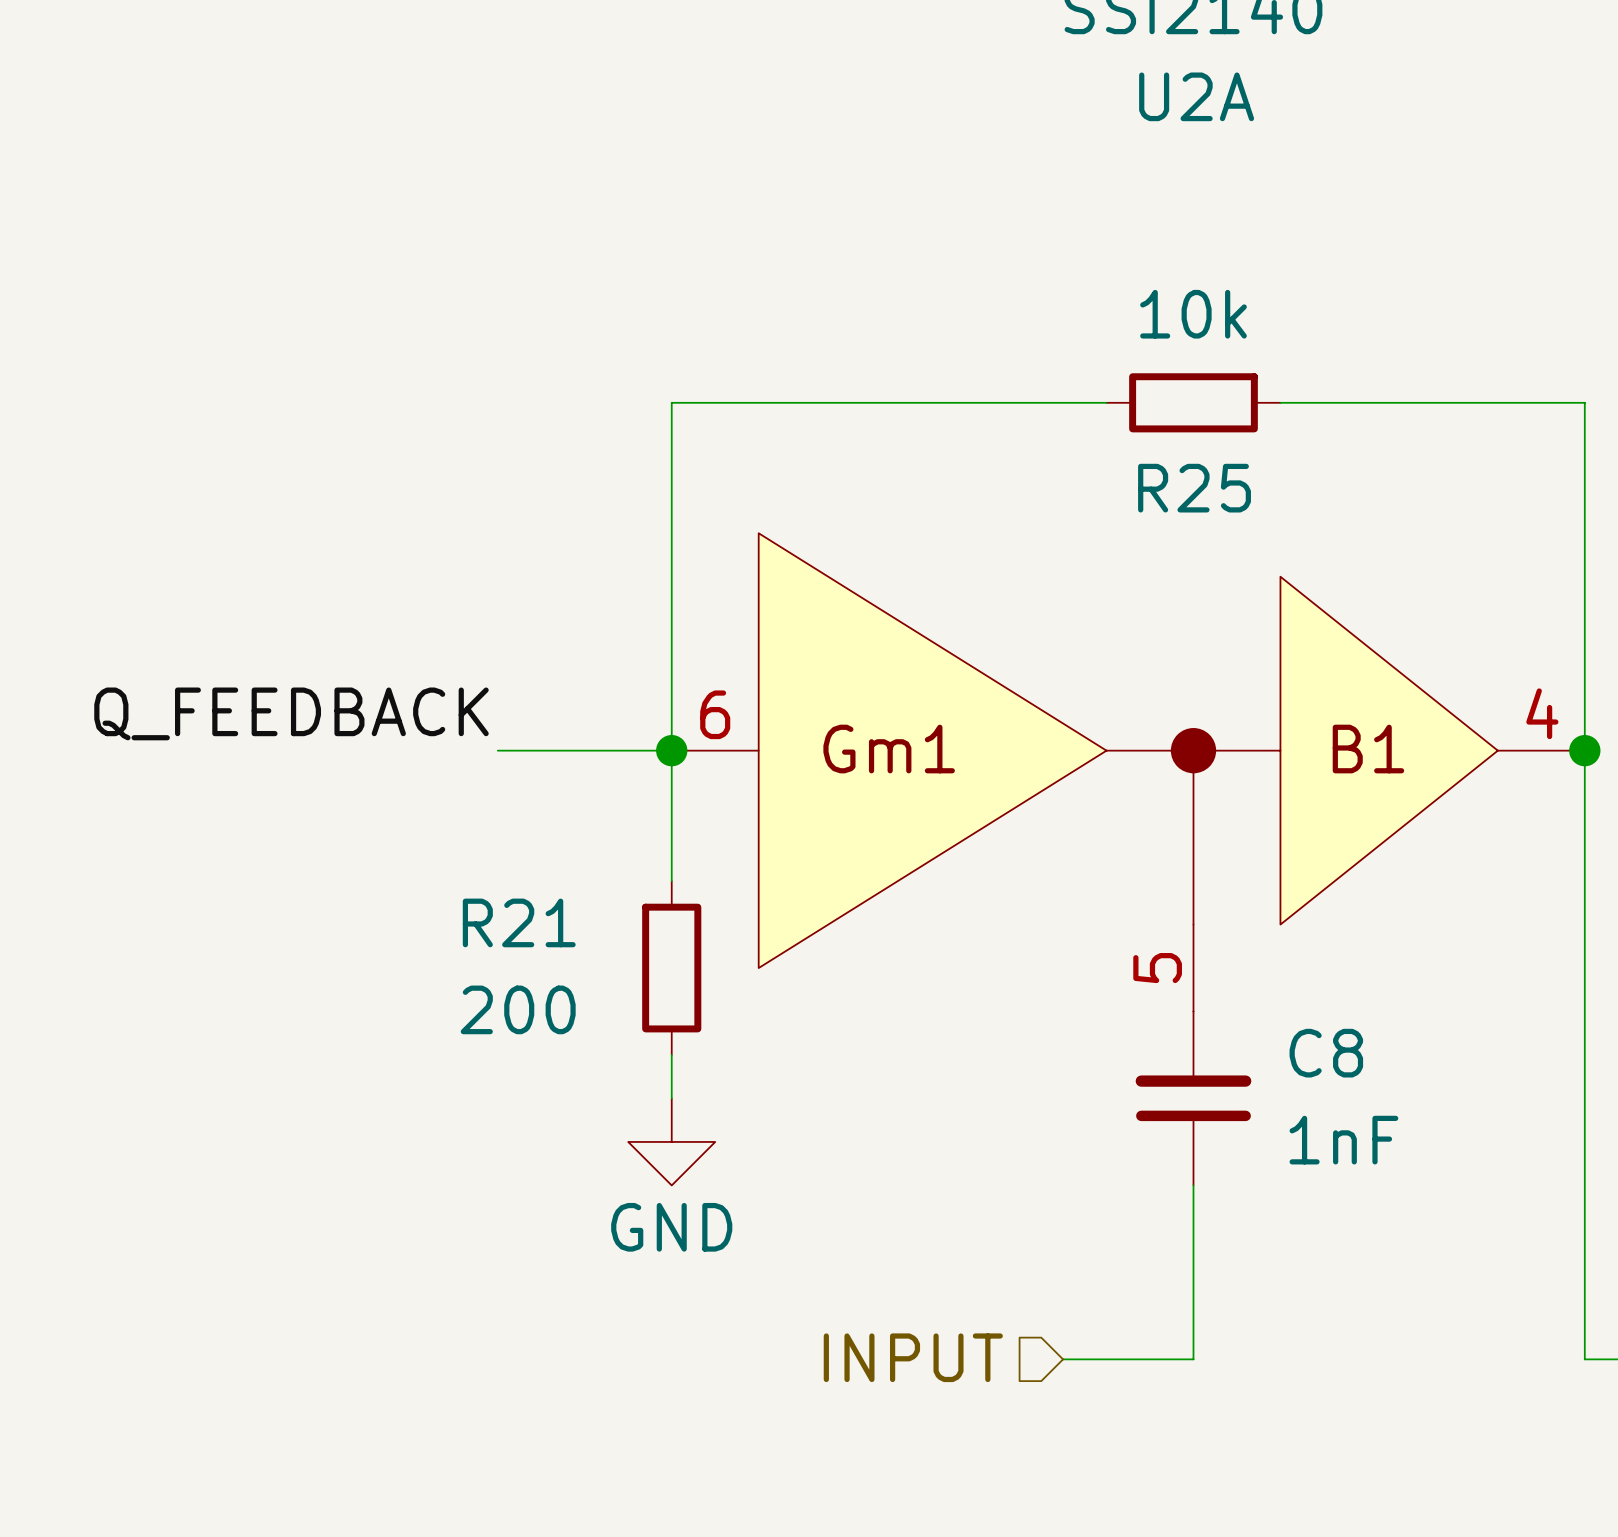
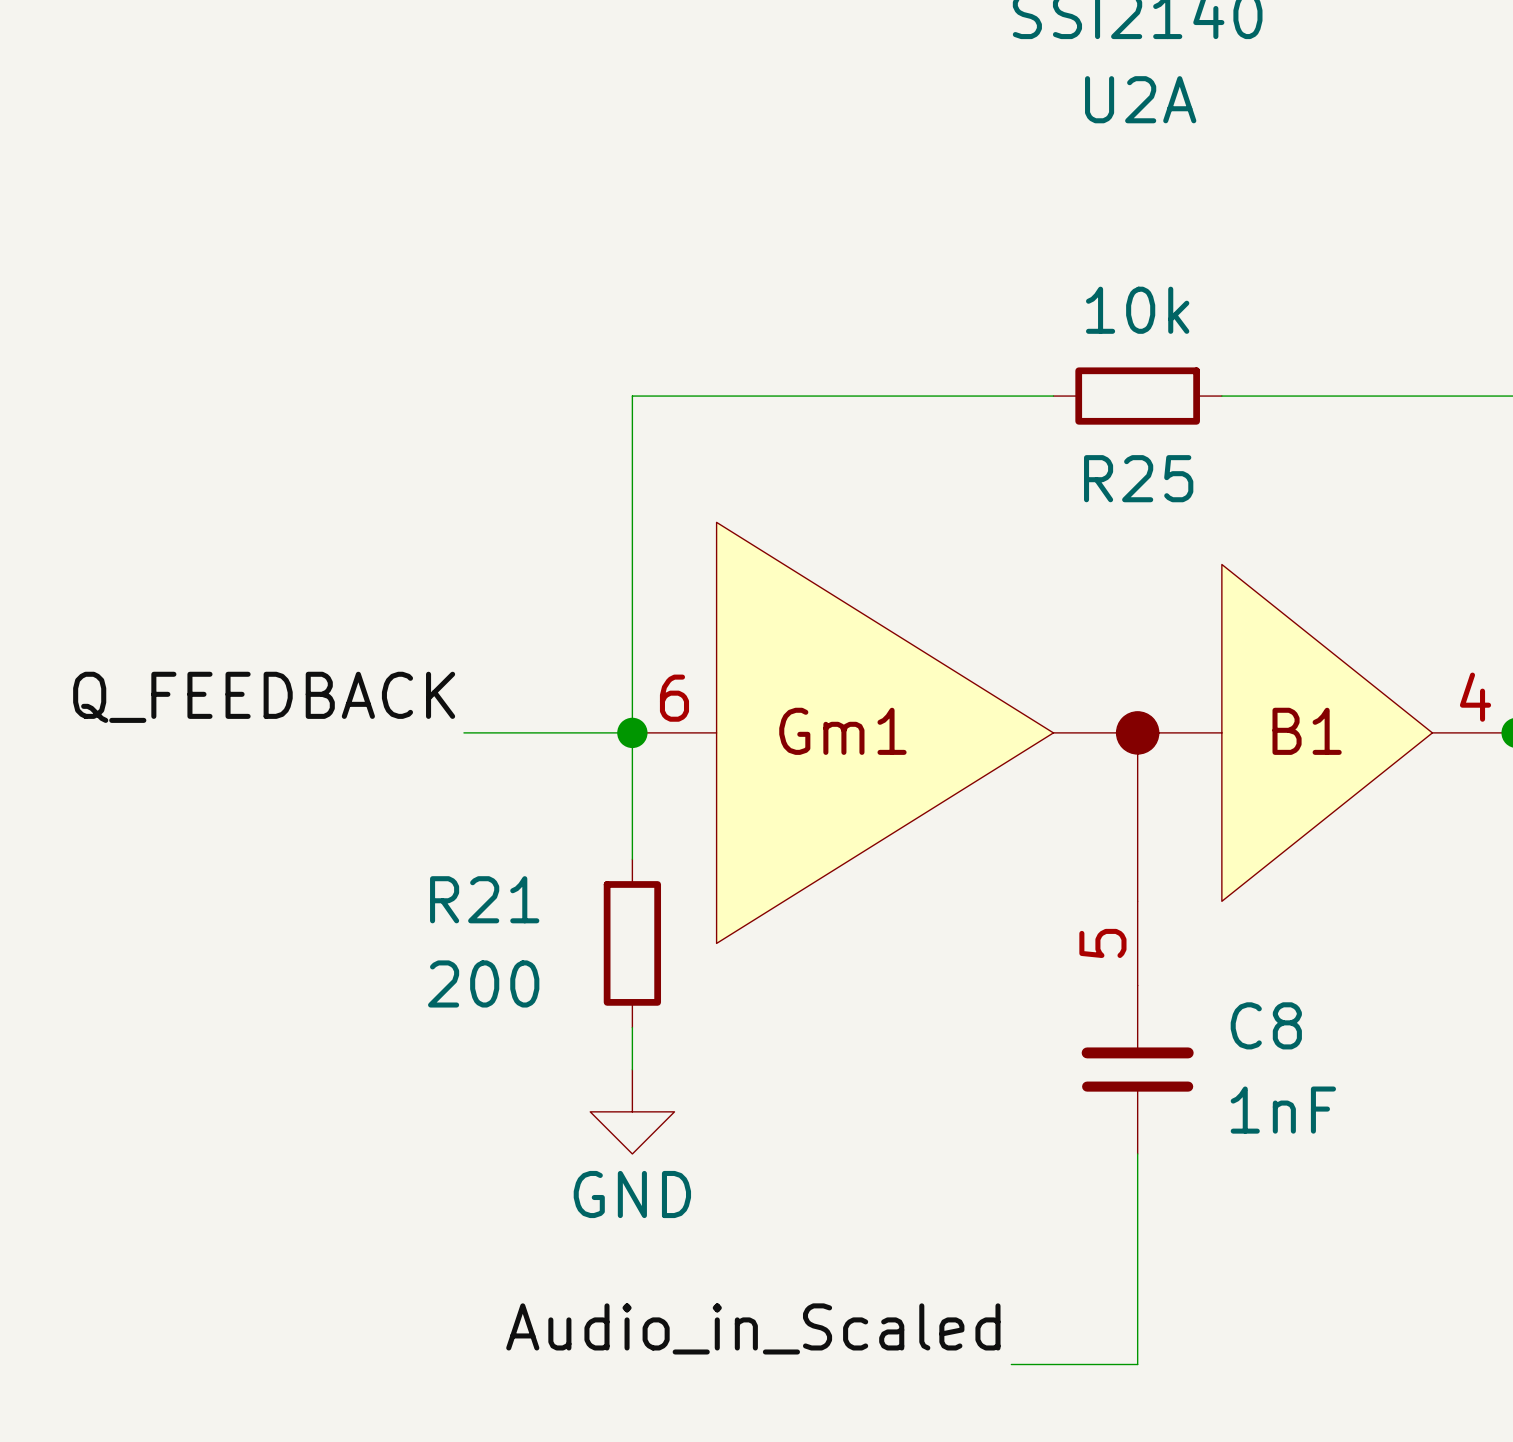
hierarchical label: INPUT (913, 1357) -> none
wire: (1063, 1359) (1193, 1359) -> (1011, 1364) (1137, 1364) (1137, 1322)
label: none -> Audio_in_Scaled (753, 1328)

